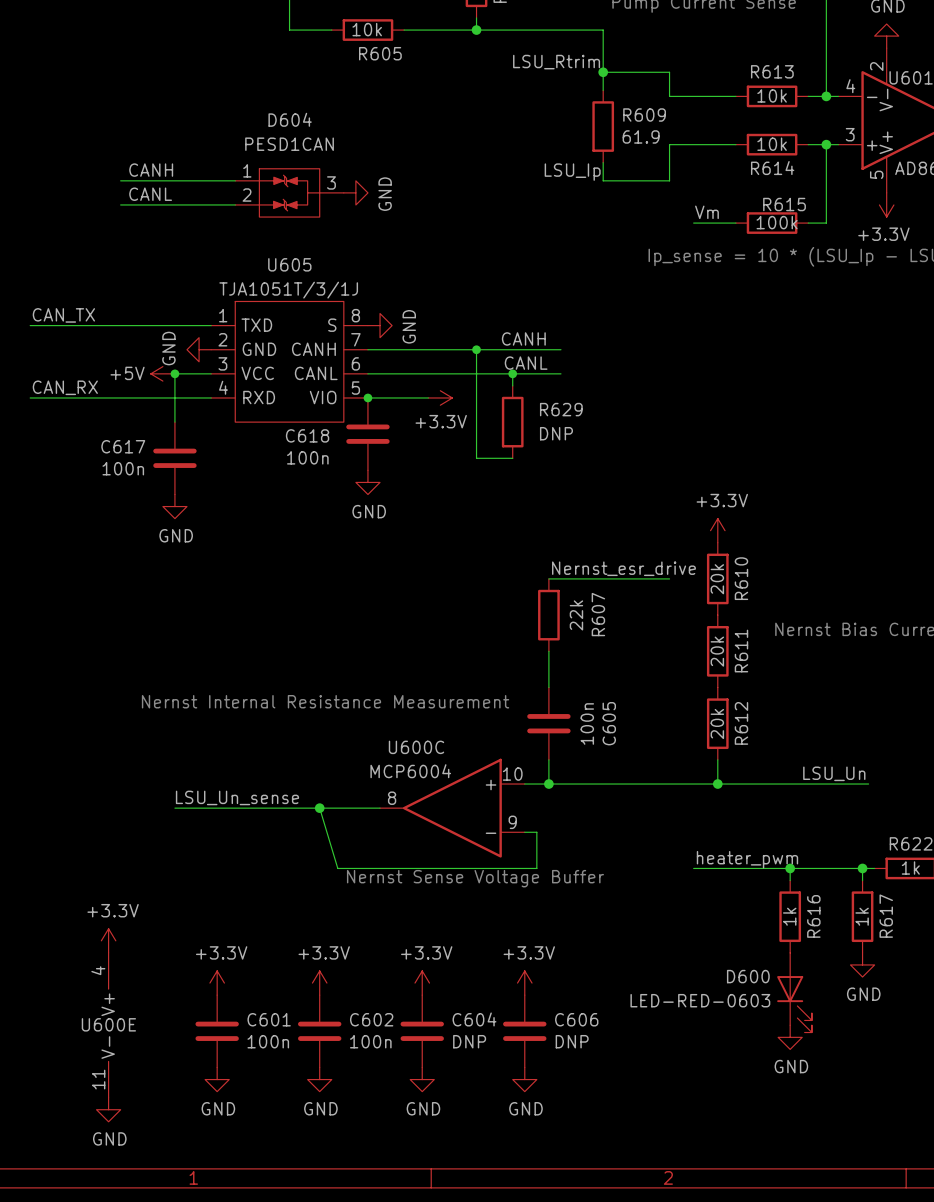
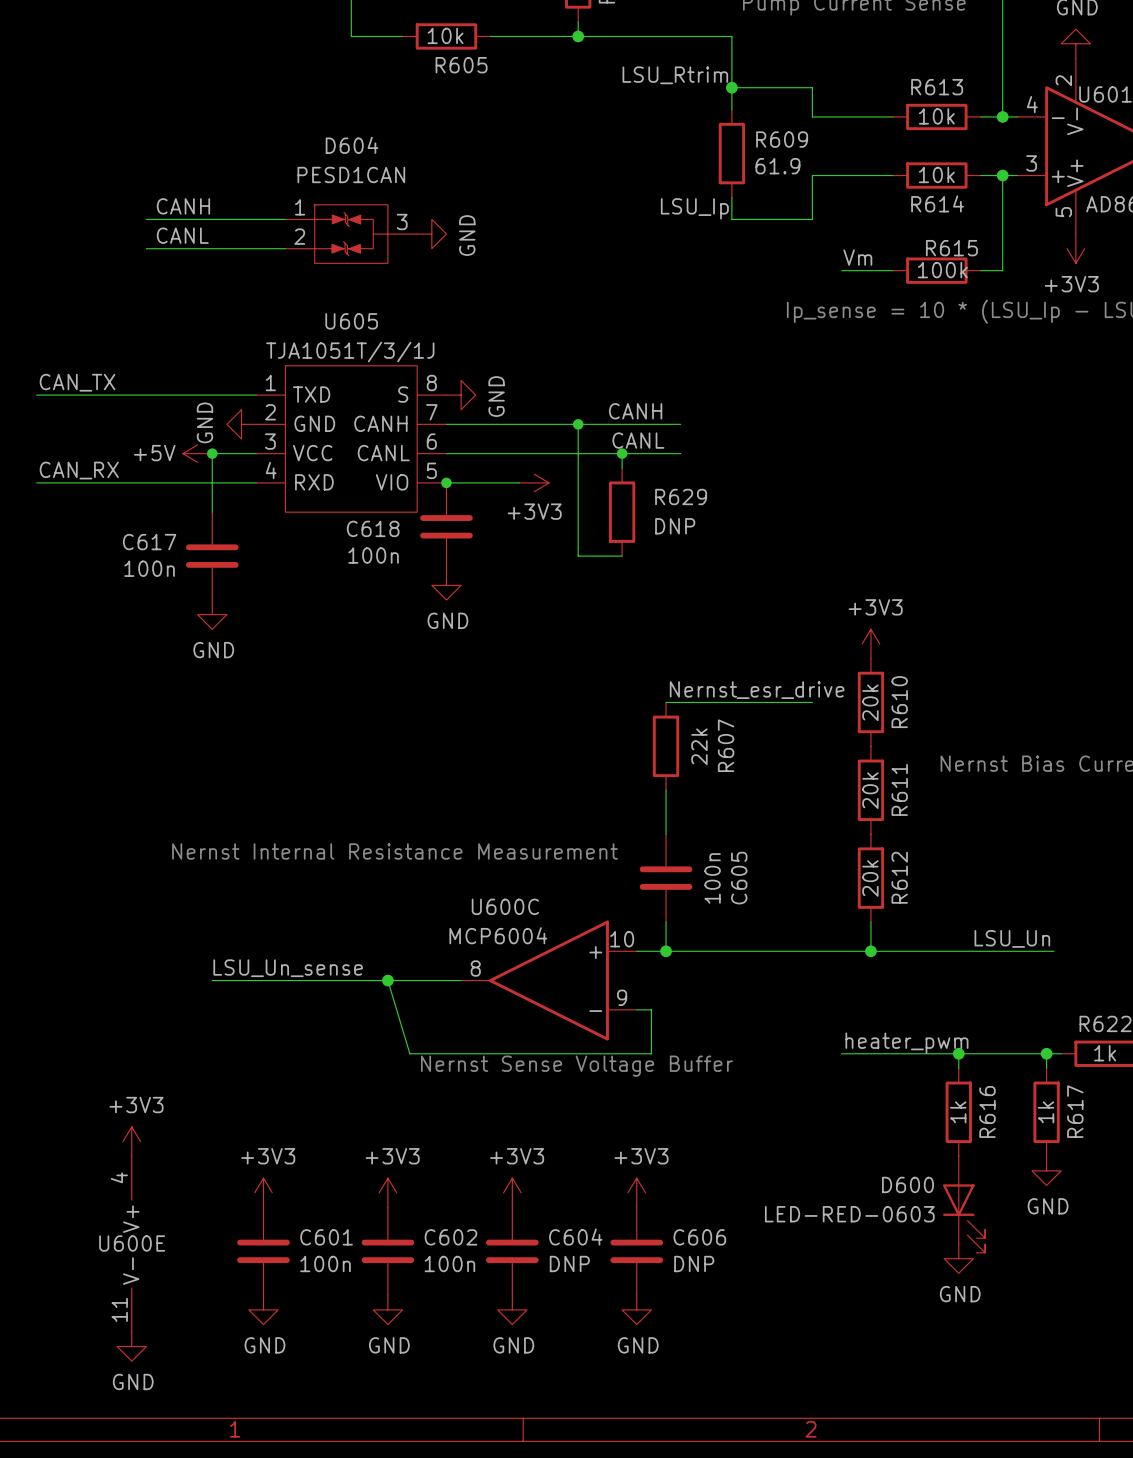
power symbol: +3.3V (886, 204) -> +3V3 (1075, 248)
power symbol: +3.3V (440, 397) -> +3V3 (534, 482)
power symbol: +3.3V (717, 530) -> +3V3 (870, 643)
power symbol: +3.3V (108, 940) -> +3V3 (131, 1141)
power symbol: +3.3V (217, 983) -> +3V3 (263, 1192)
power symbol: +3.3V (319, 983) -> +3V3 (387, 1192)
power symbol: +3.3V (422, 983) -> +3V3 (512, 1192)
power symbol: +3.3V (524, 983) -> +3V3 (636, 1192)

